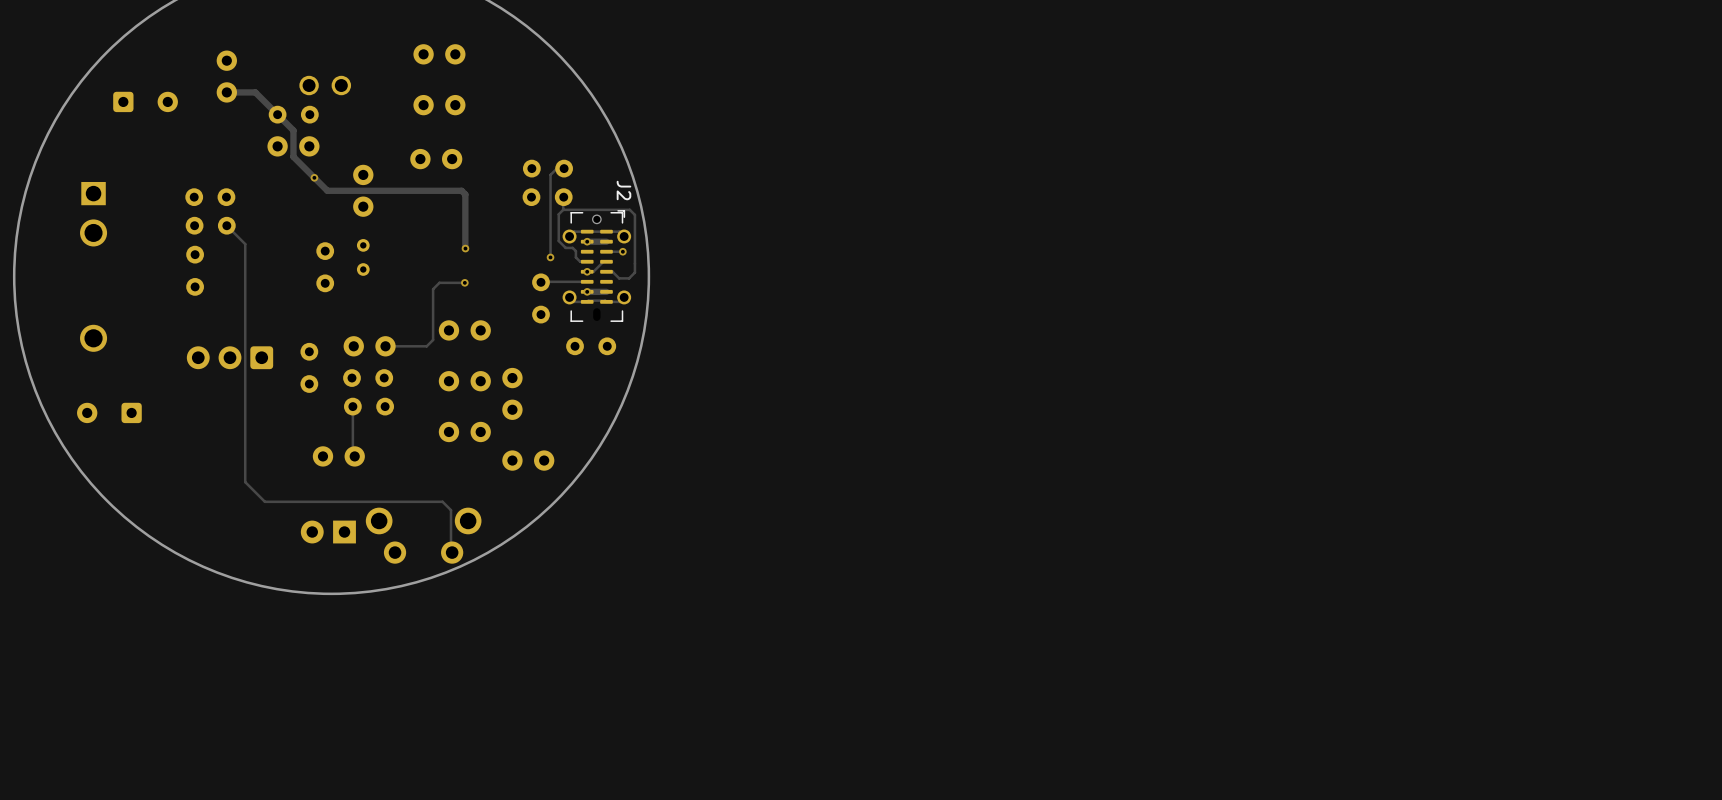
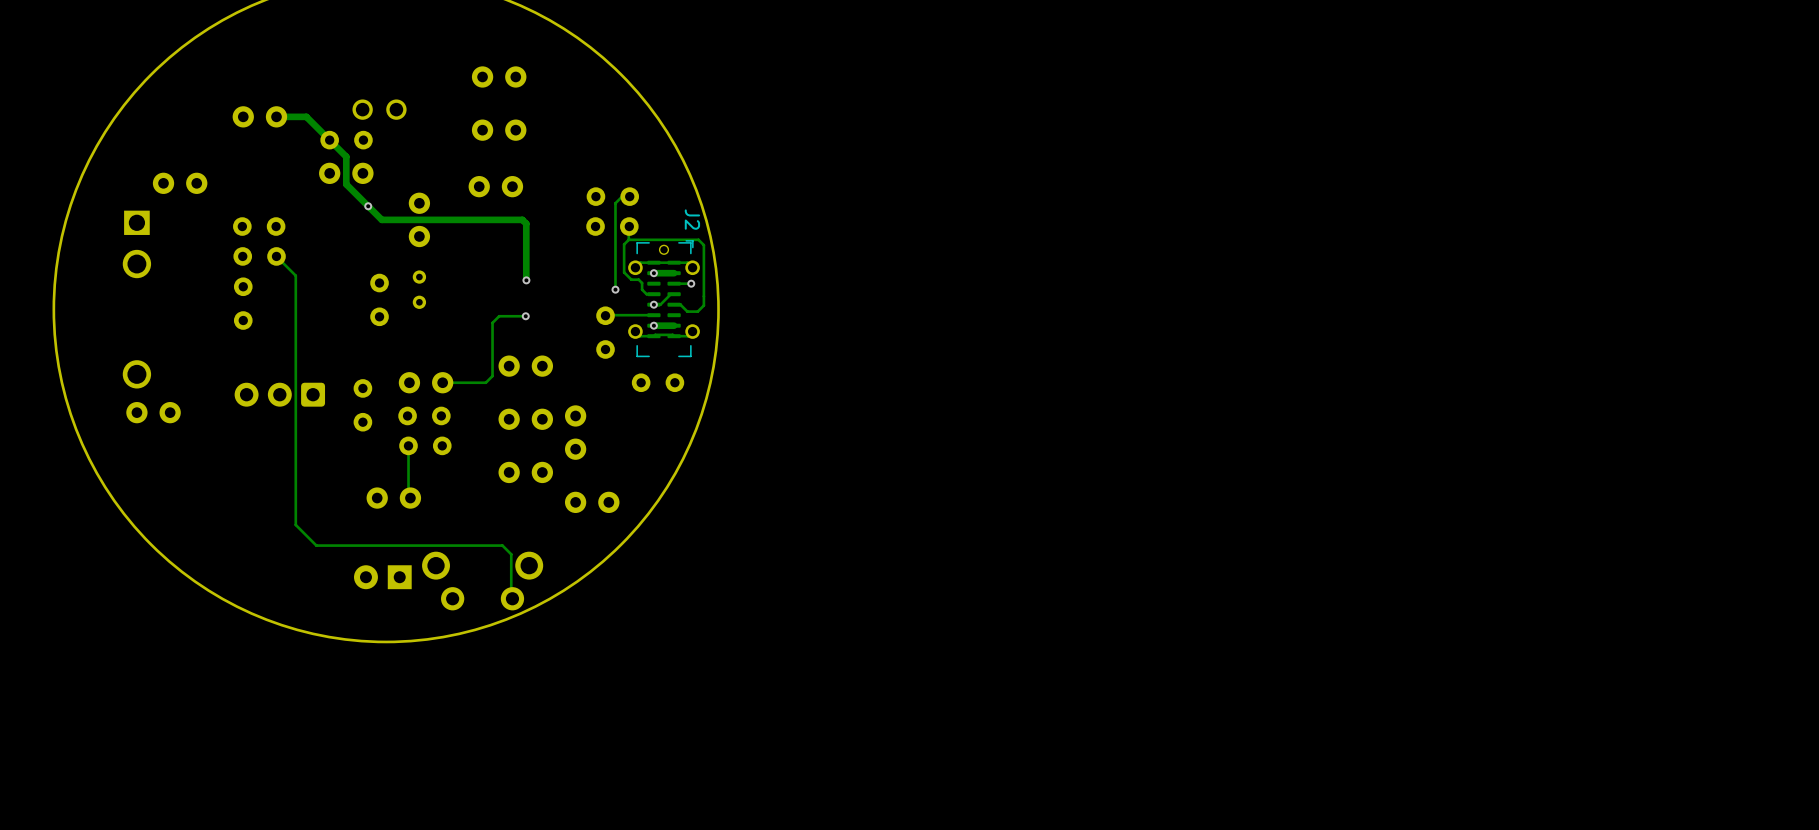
part rotation: 0° (226, 76) -> 90° clockwise (259, 116)
part: (145, 101) -> none
part: none -> (180, 183)
part: none -> (153, 412)
part: (109, 412) -> none

